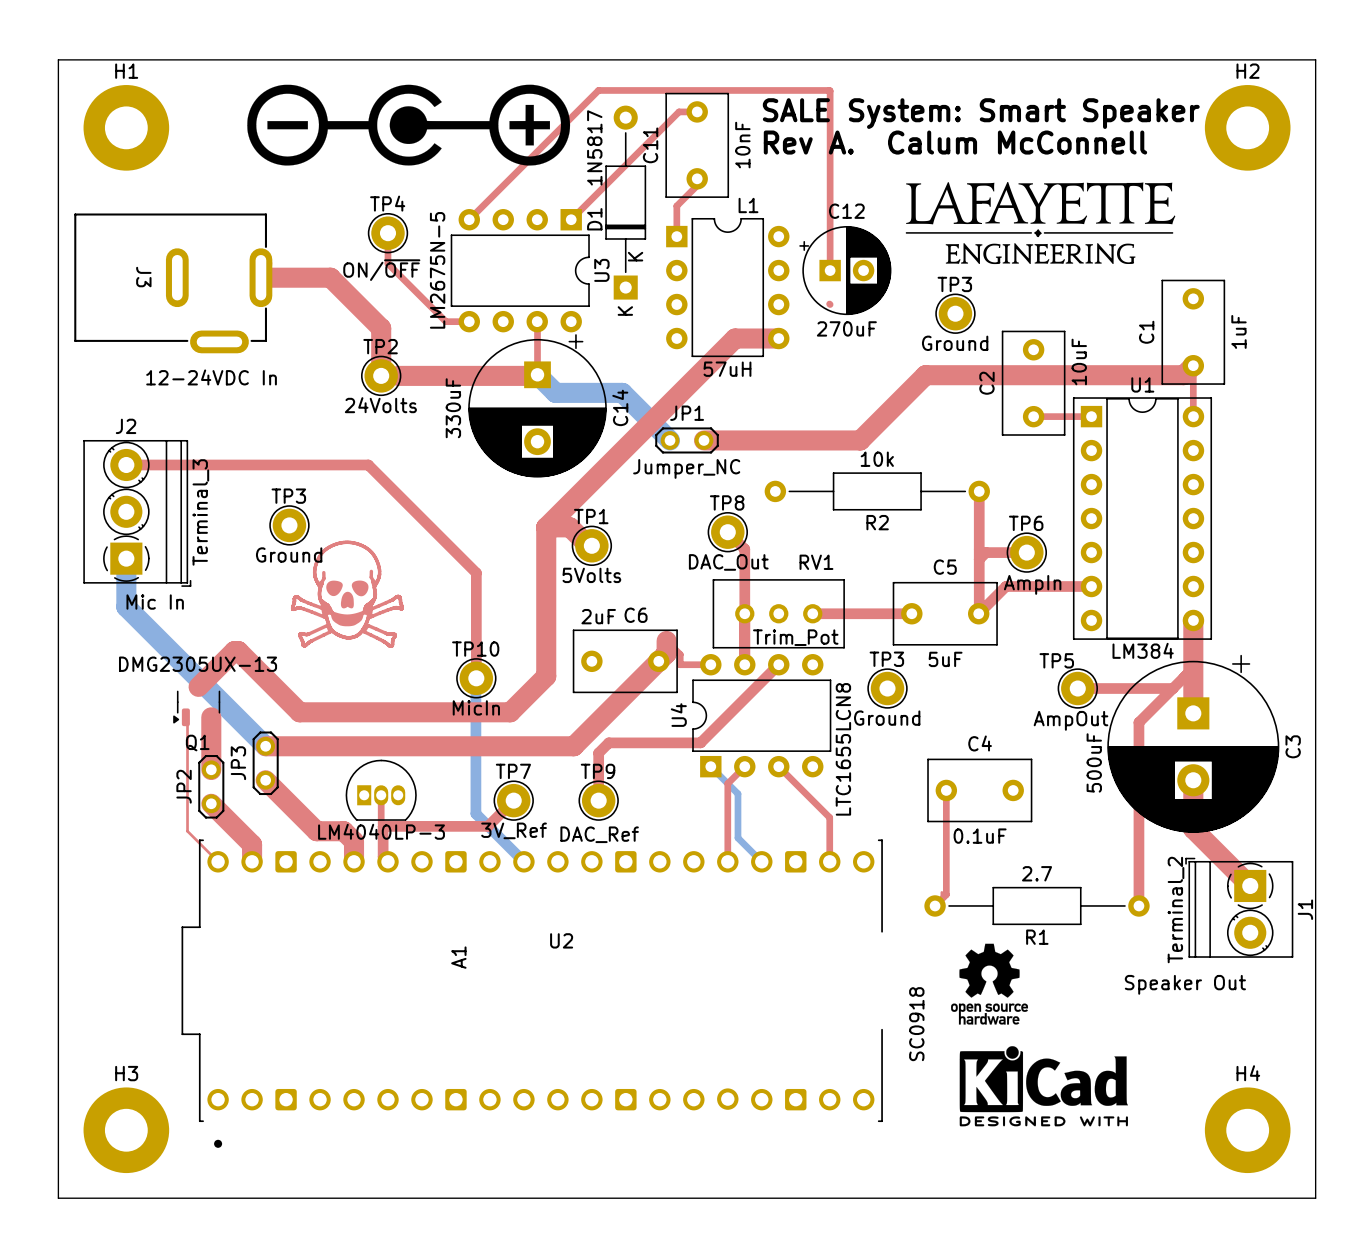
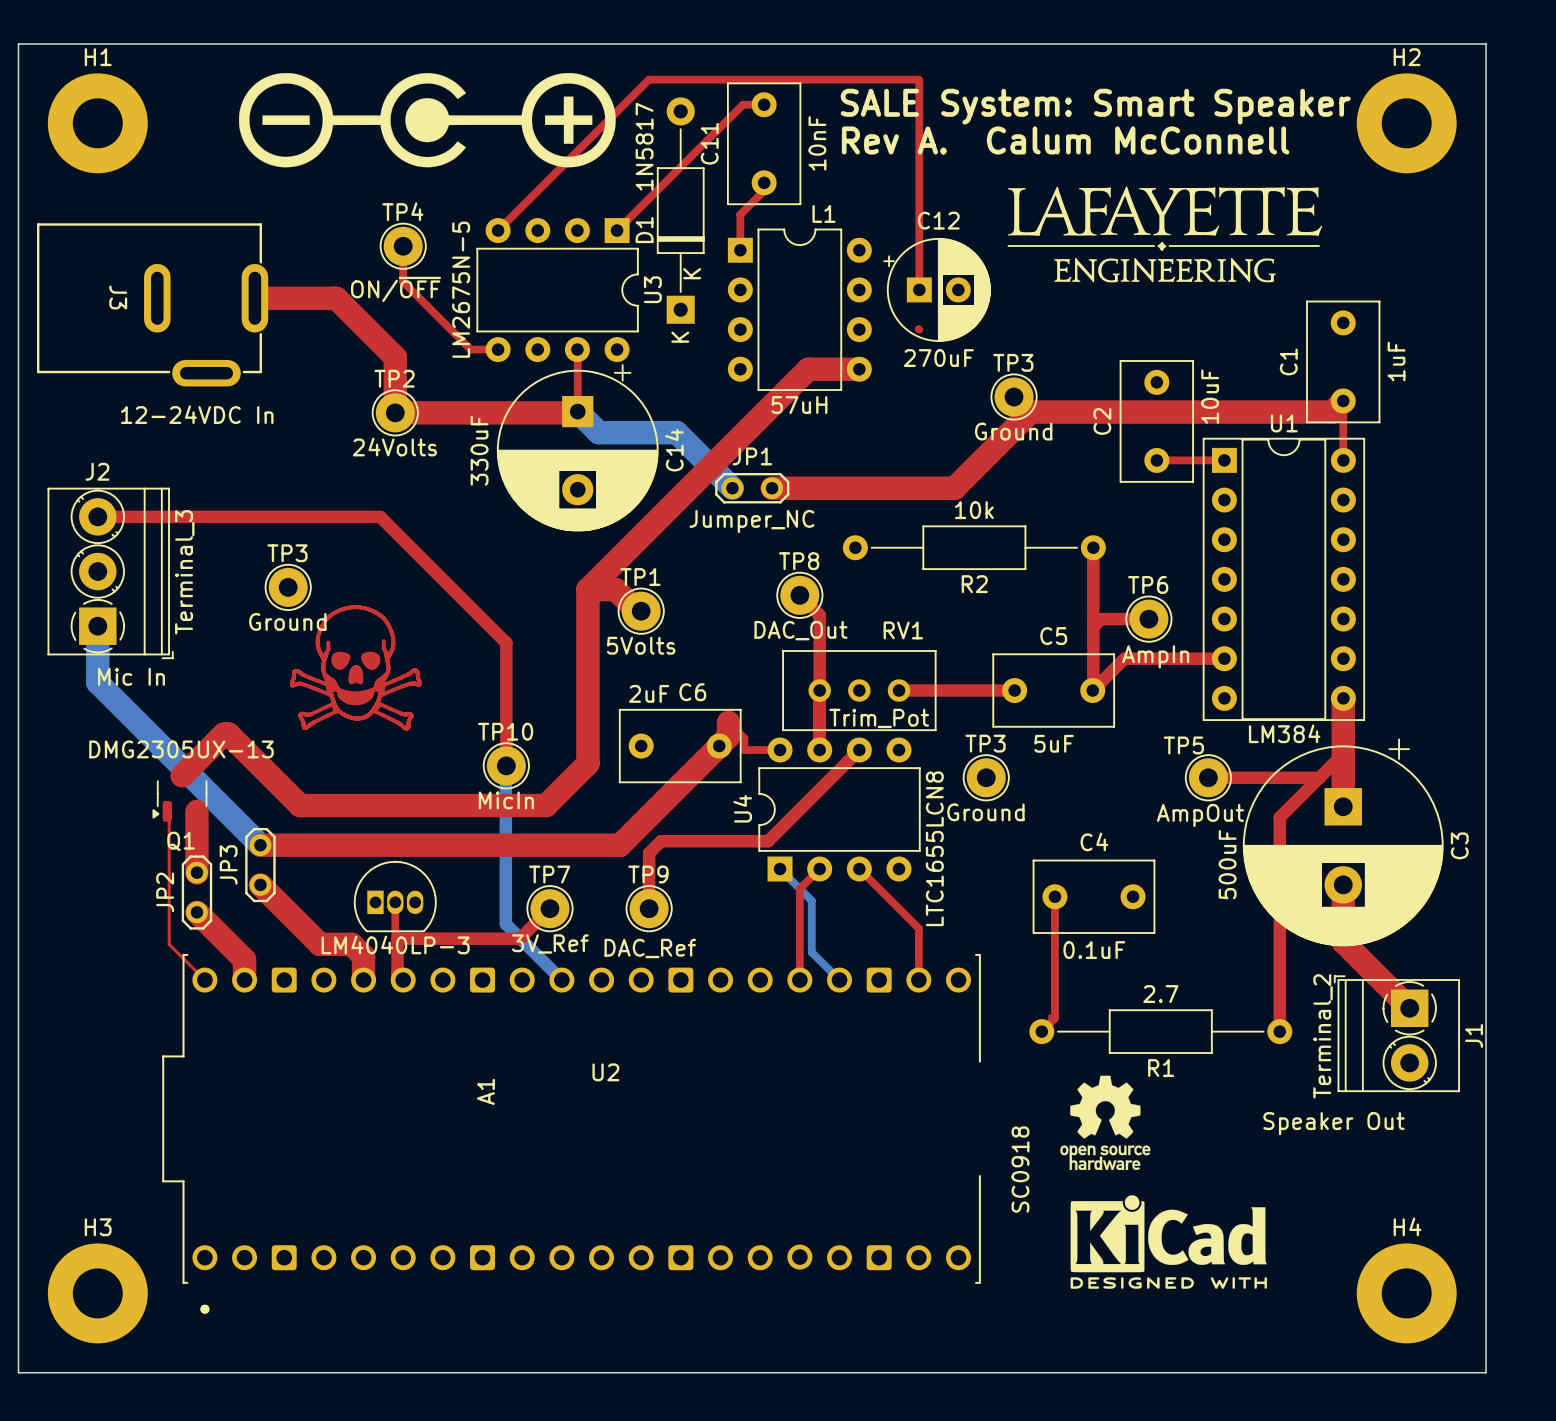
TP3 position: (955, 313) -> (1014, 397)

